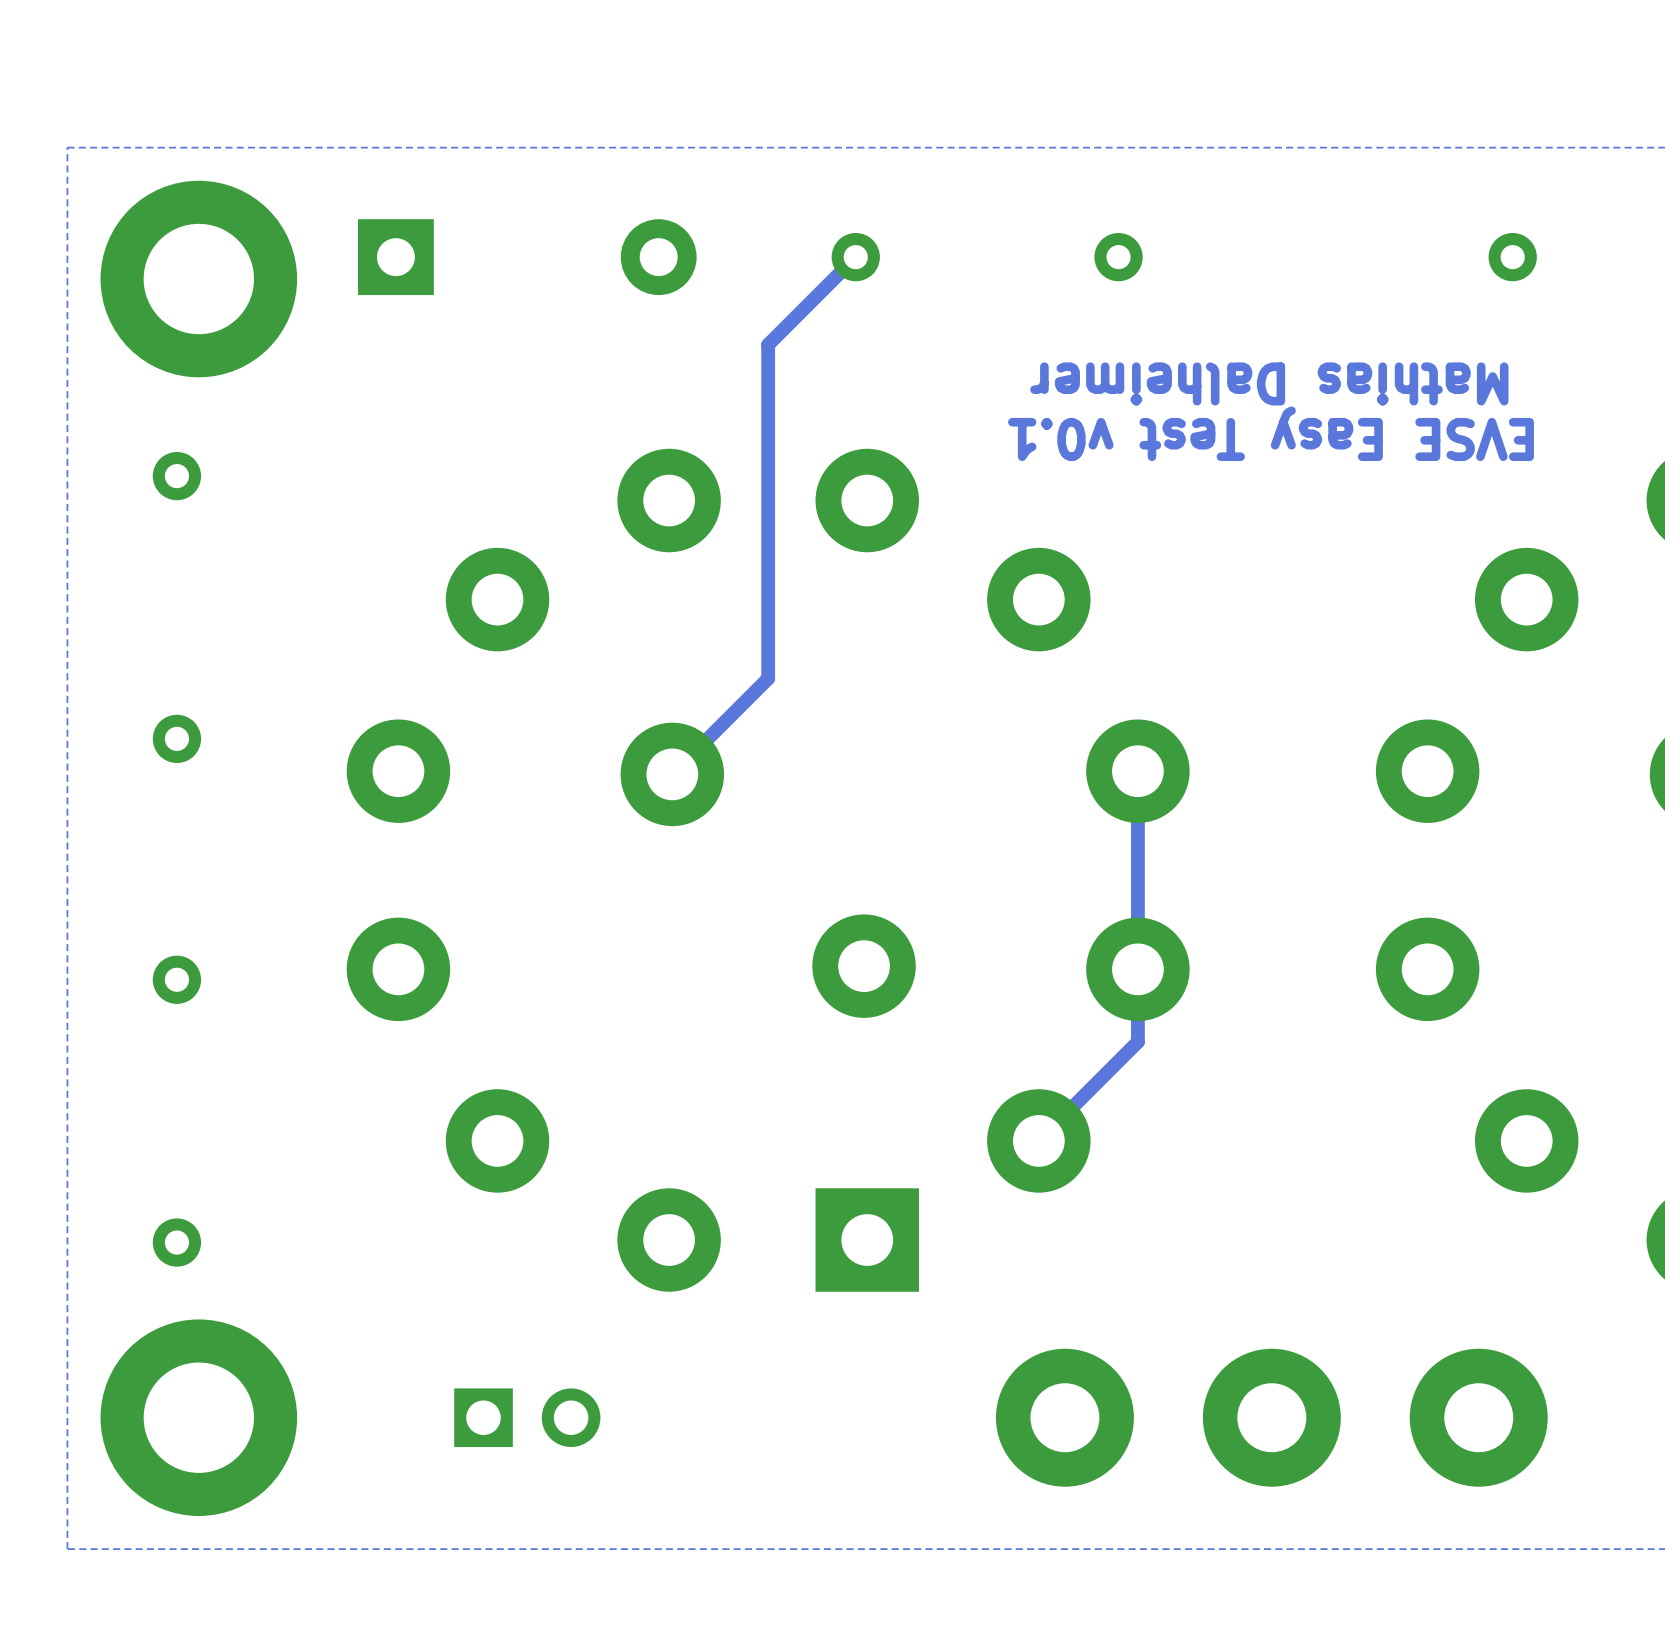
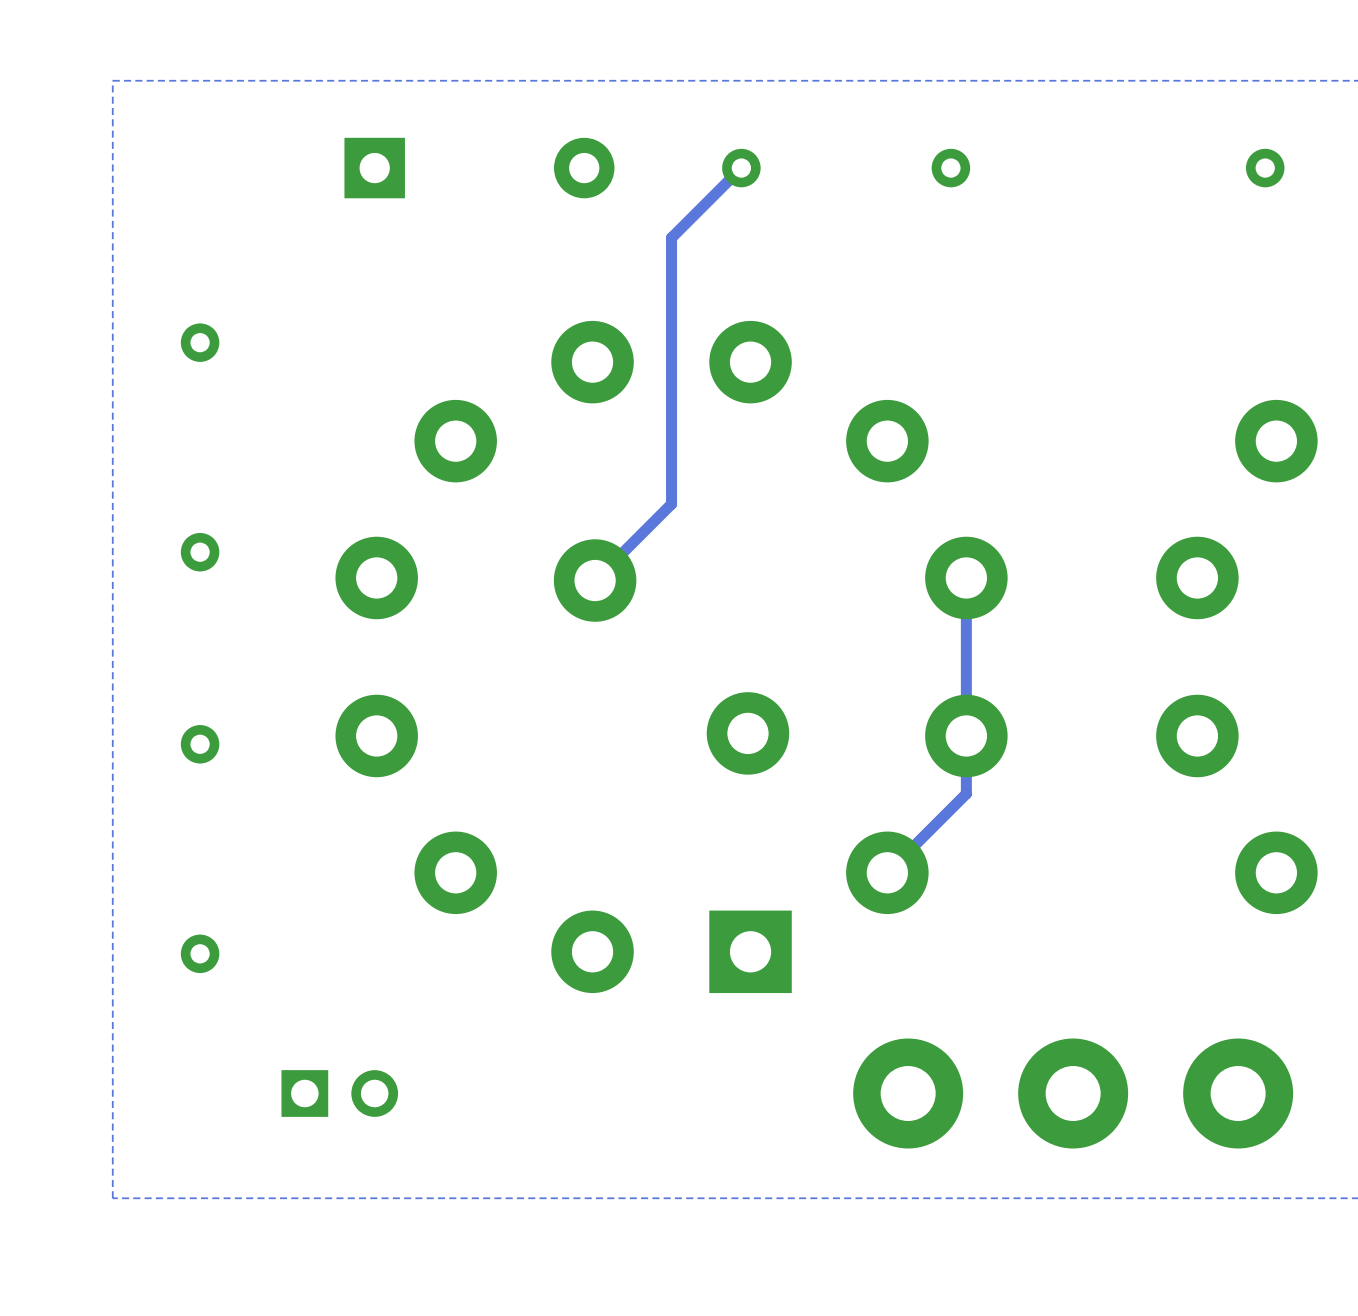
part: (198, 279) -> none
text: Mathias Dalheimer (1269, 383) -> none
text: EVSE Easy Test v0.1 (1271, 433) -> none
part: (198, 1417) -> none
part position: (527, 1417) -> (339, 1093)

